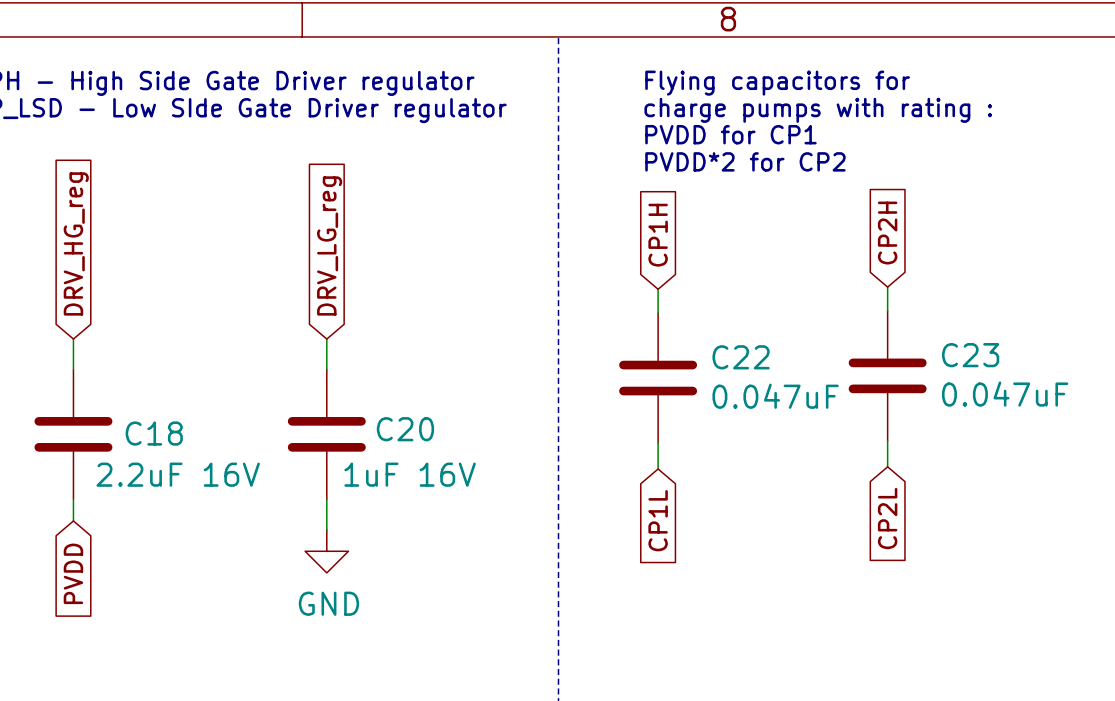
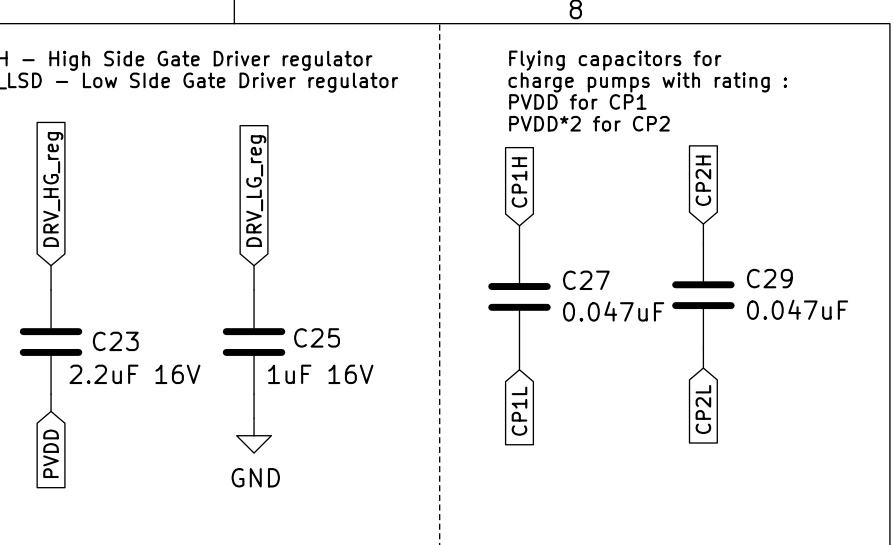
C23 name: C23 (970, 355) -> C29 (769, 278)
C22 name: C22 (741, 357) -> C27 (586, 280)
C20 name: C20 (405, 429) -> C25 (317, 337)
C18 name: C18 (154, 433) -> C23 (115, 341)

